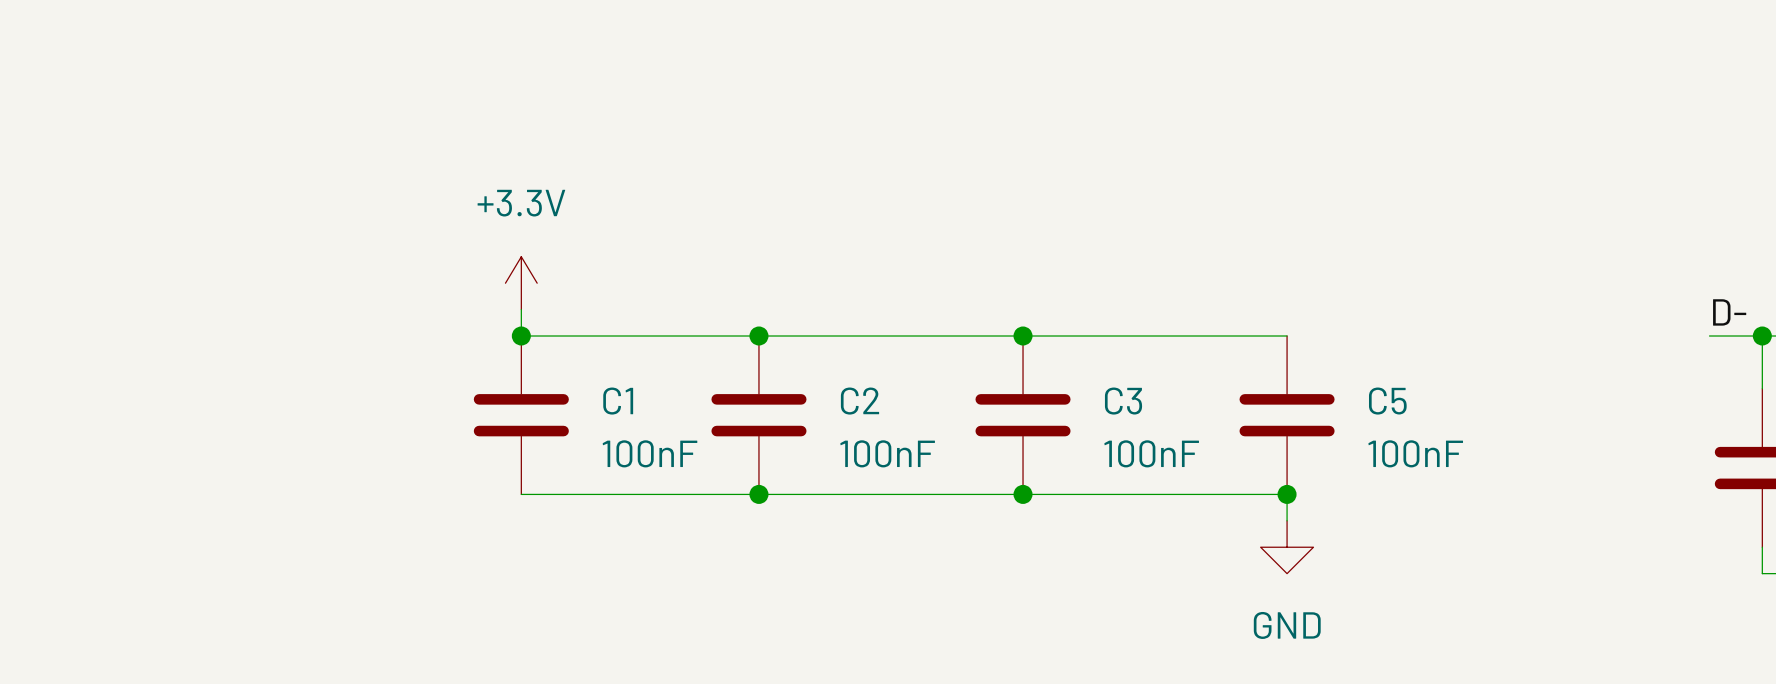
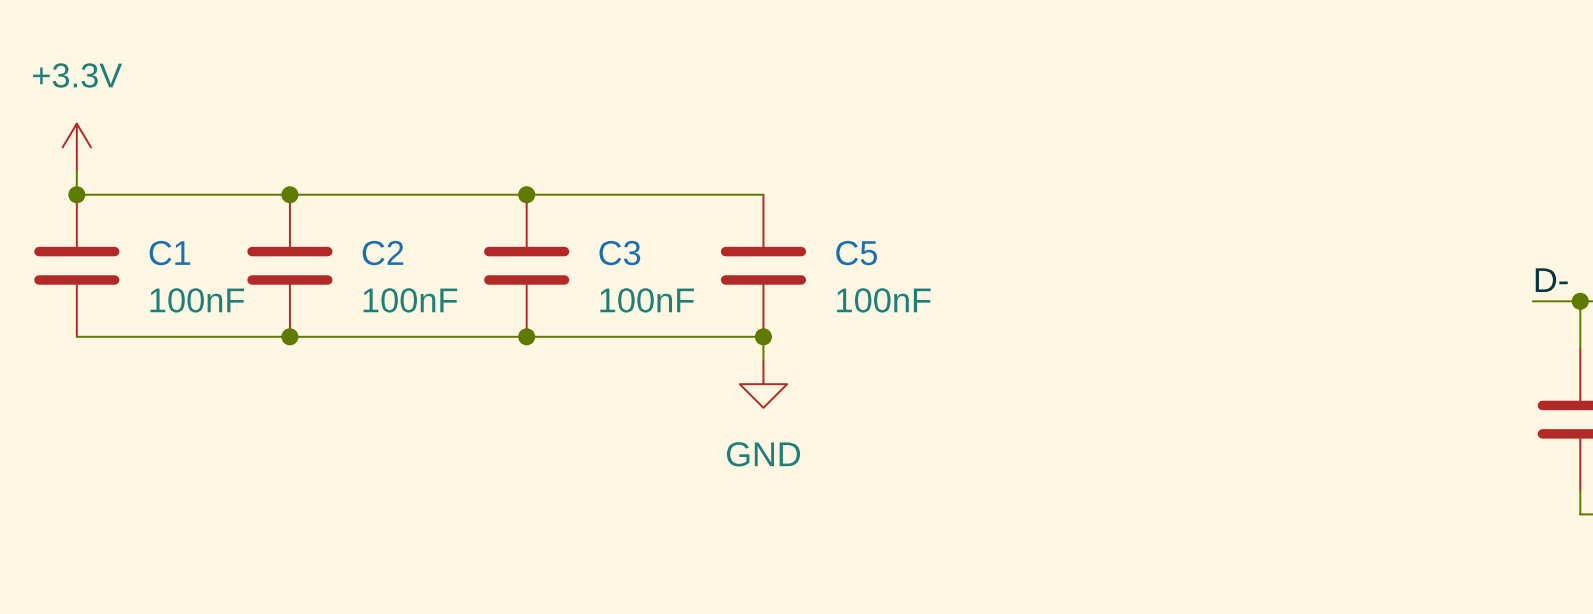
junction: none -> (76, 194)
junction: none -> (289, 194)
junction: none -> (526, 194)
power symbol position: +3.3V (521, 283) -> +3.3V (76, 147)
wire: (521, 309) (521, 336) (1287, 336) -> (76, 171) (76, 194) (763, 194)
junction: (521, 336) -> none
junction: (758, 336) -> none
junction: (1023, 336) -> none
junction: none -> (289, 336)
junction: none -> (526, 336)
junction: none -> (763, 336)
C1 position: (521, 415) -> (76, 265)
C2 position: (758, 415) -> (289, 265)
C3 position: (1023, 415) -> (526, 265)
C5 position: (1287, 415) -> (763, 265)
wire: (521, 494) (1287, 494) (1287, 520) -> (76, 336) (763, 336) (763, 360)
junction: (758, 494) -> none
junction: (1023, 494) -> none
junction: (1287, 494) -> none
power symbol position: GND (1287, 547) -> GND (763, 384)

